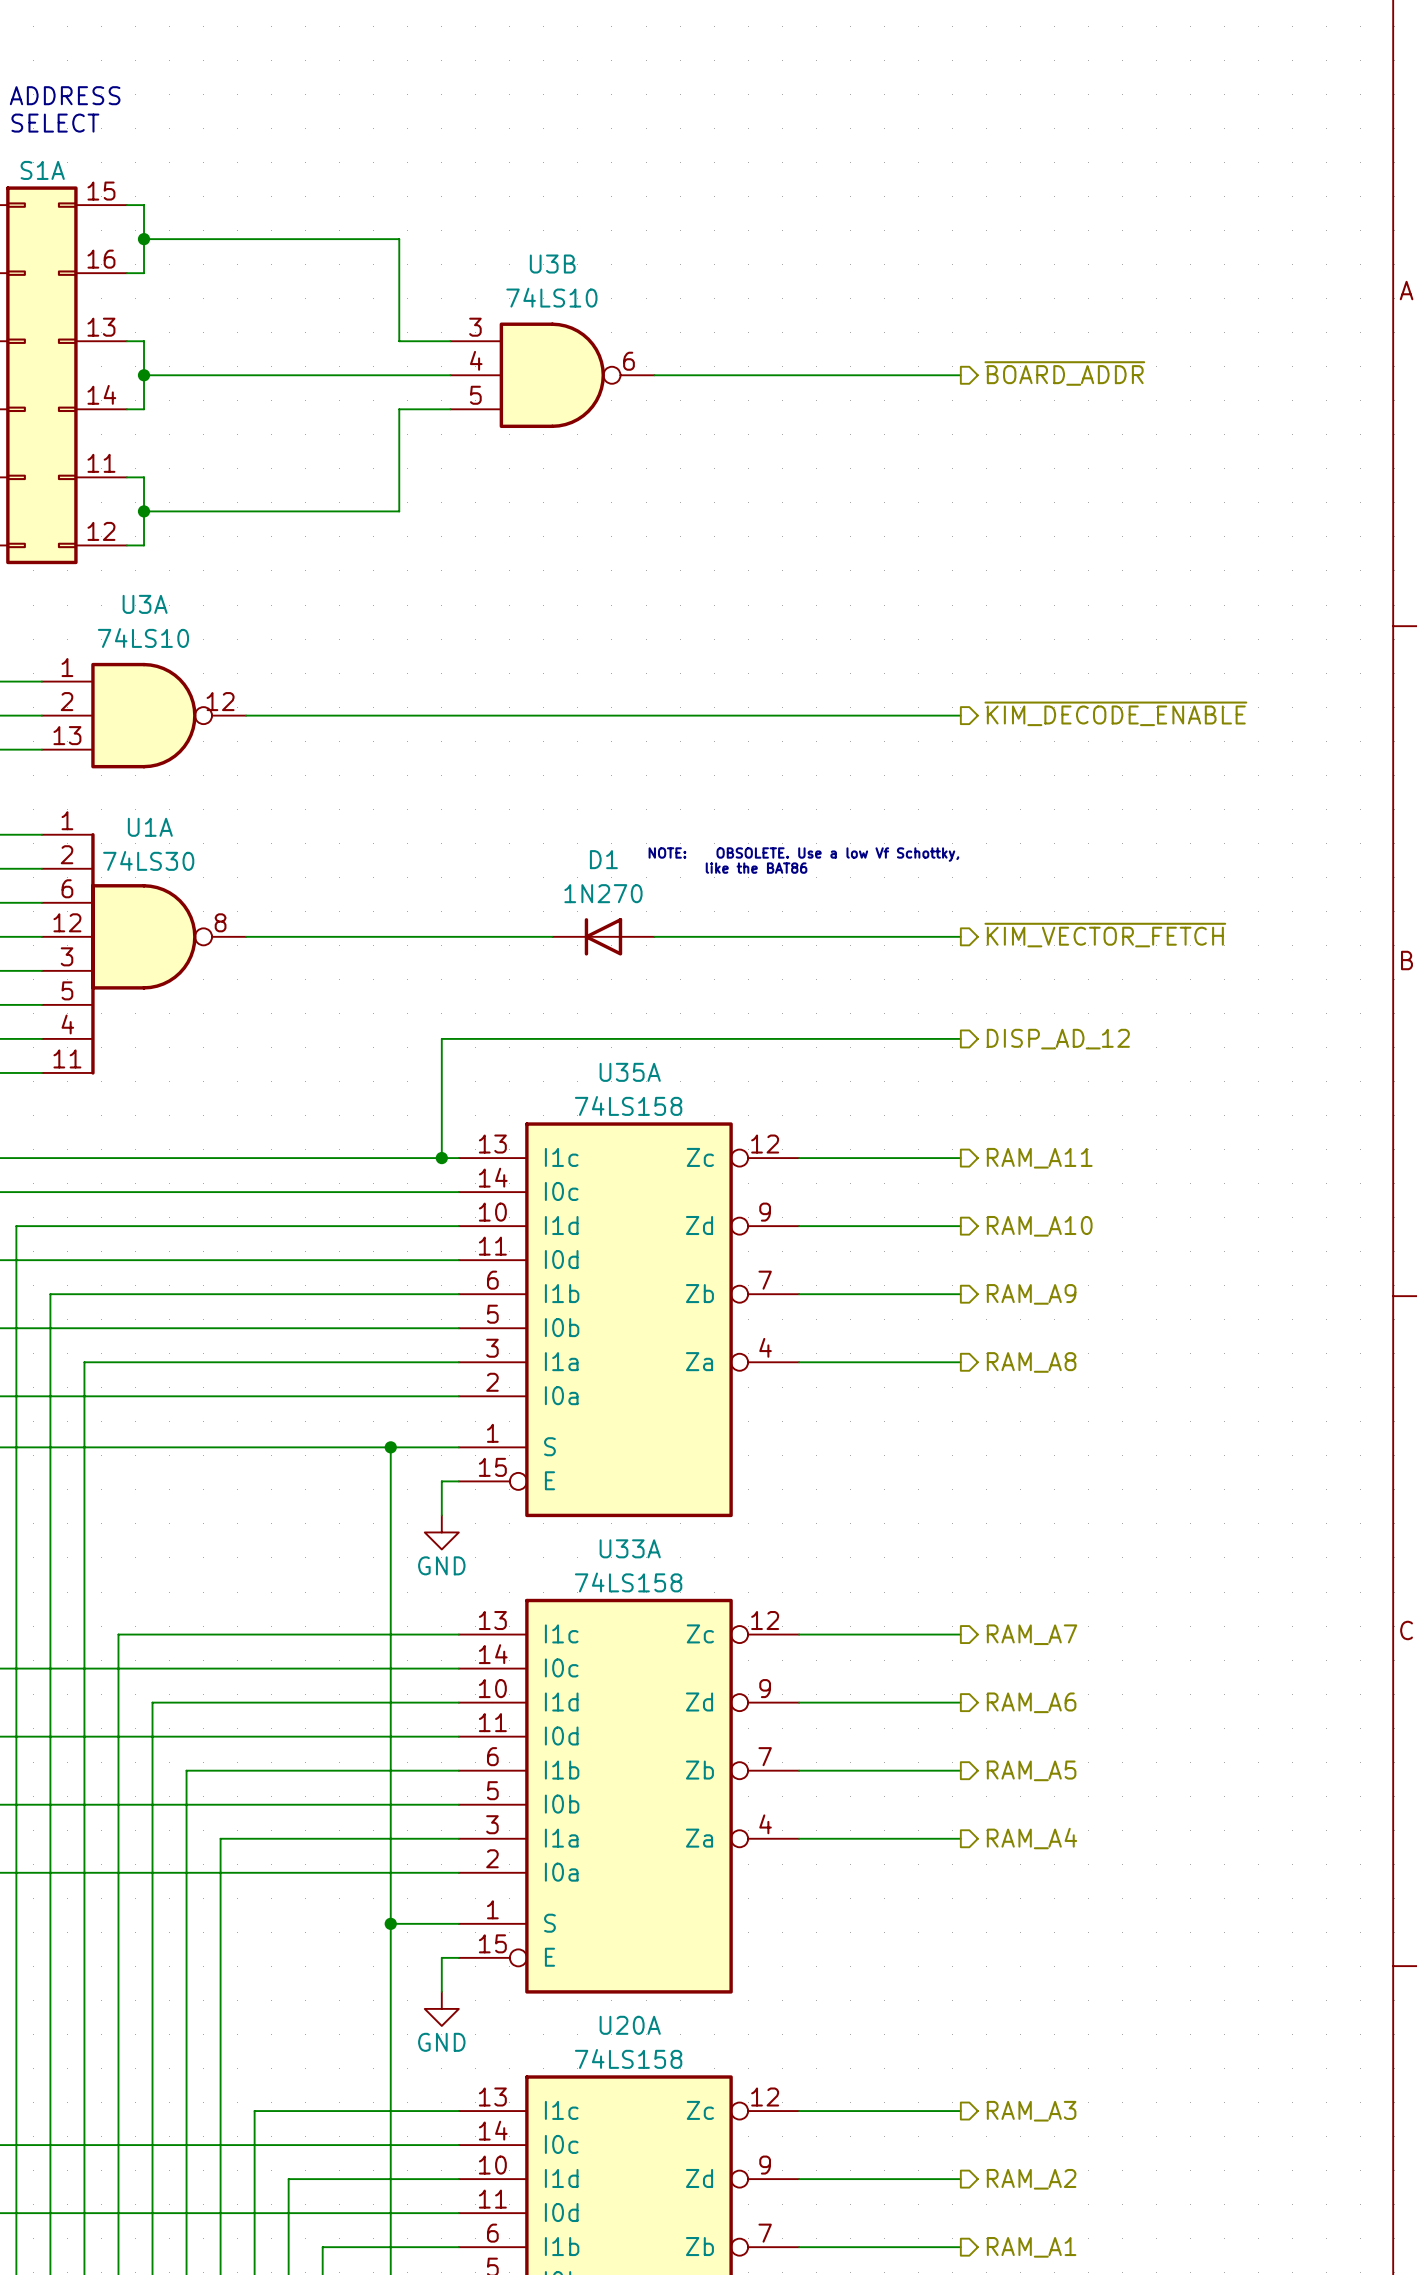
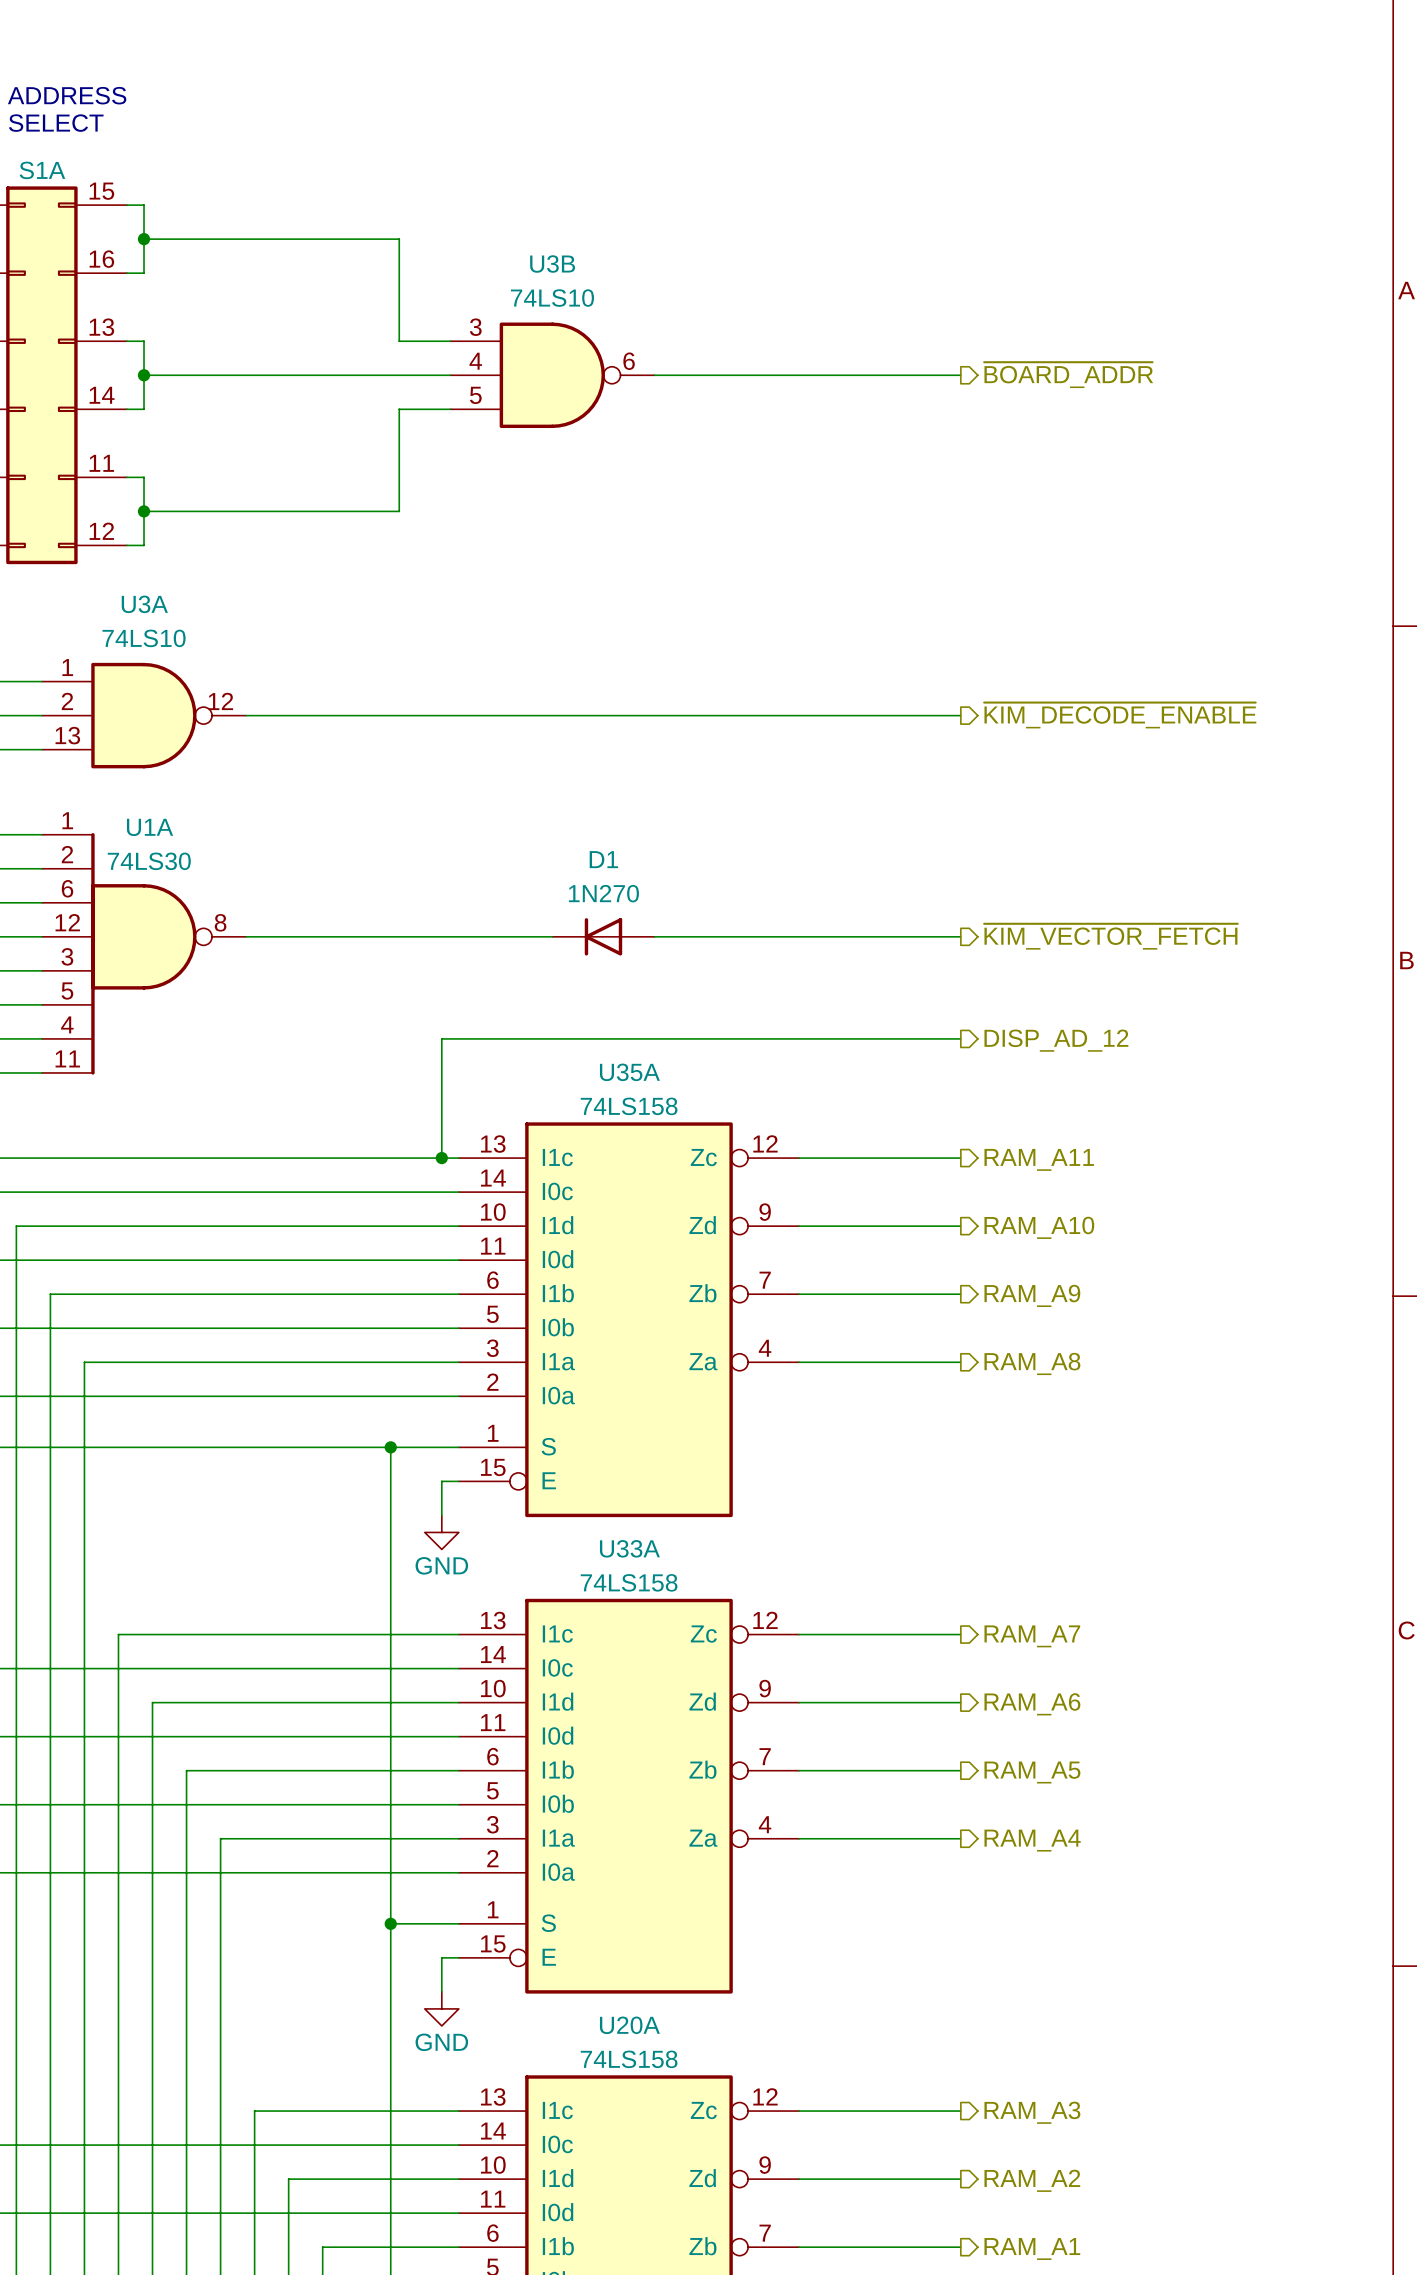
text: NOTE: OBSOLETE. Use a low Vf Schottky, (803, 854) -> none
text: like the BAT86 (756, 868) -> none

